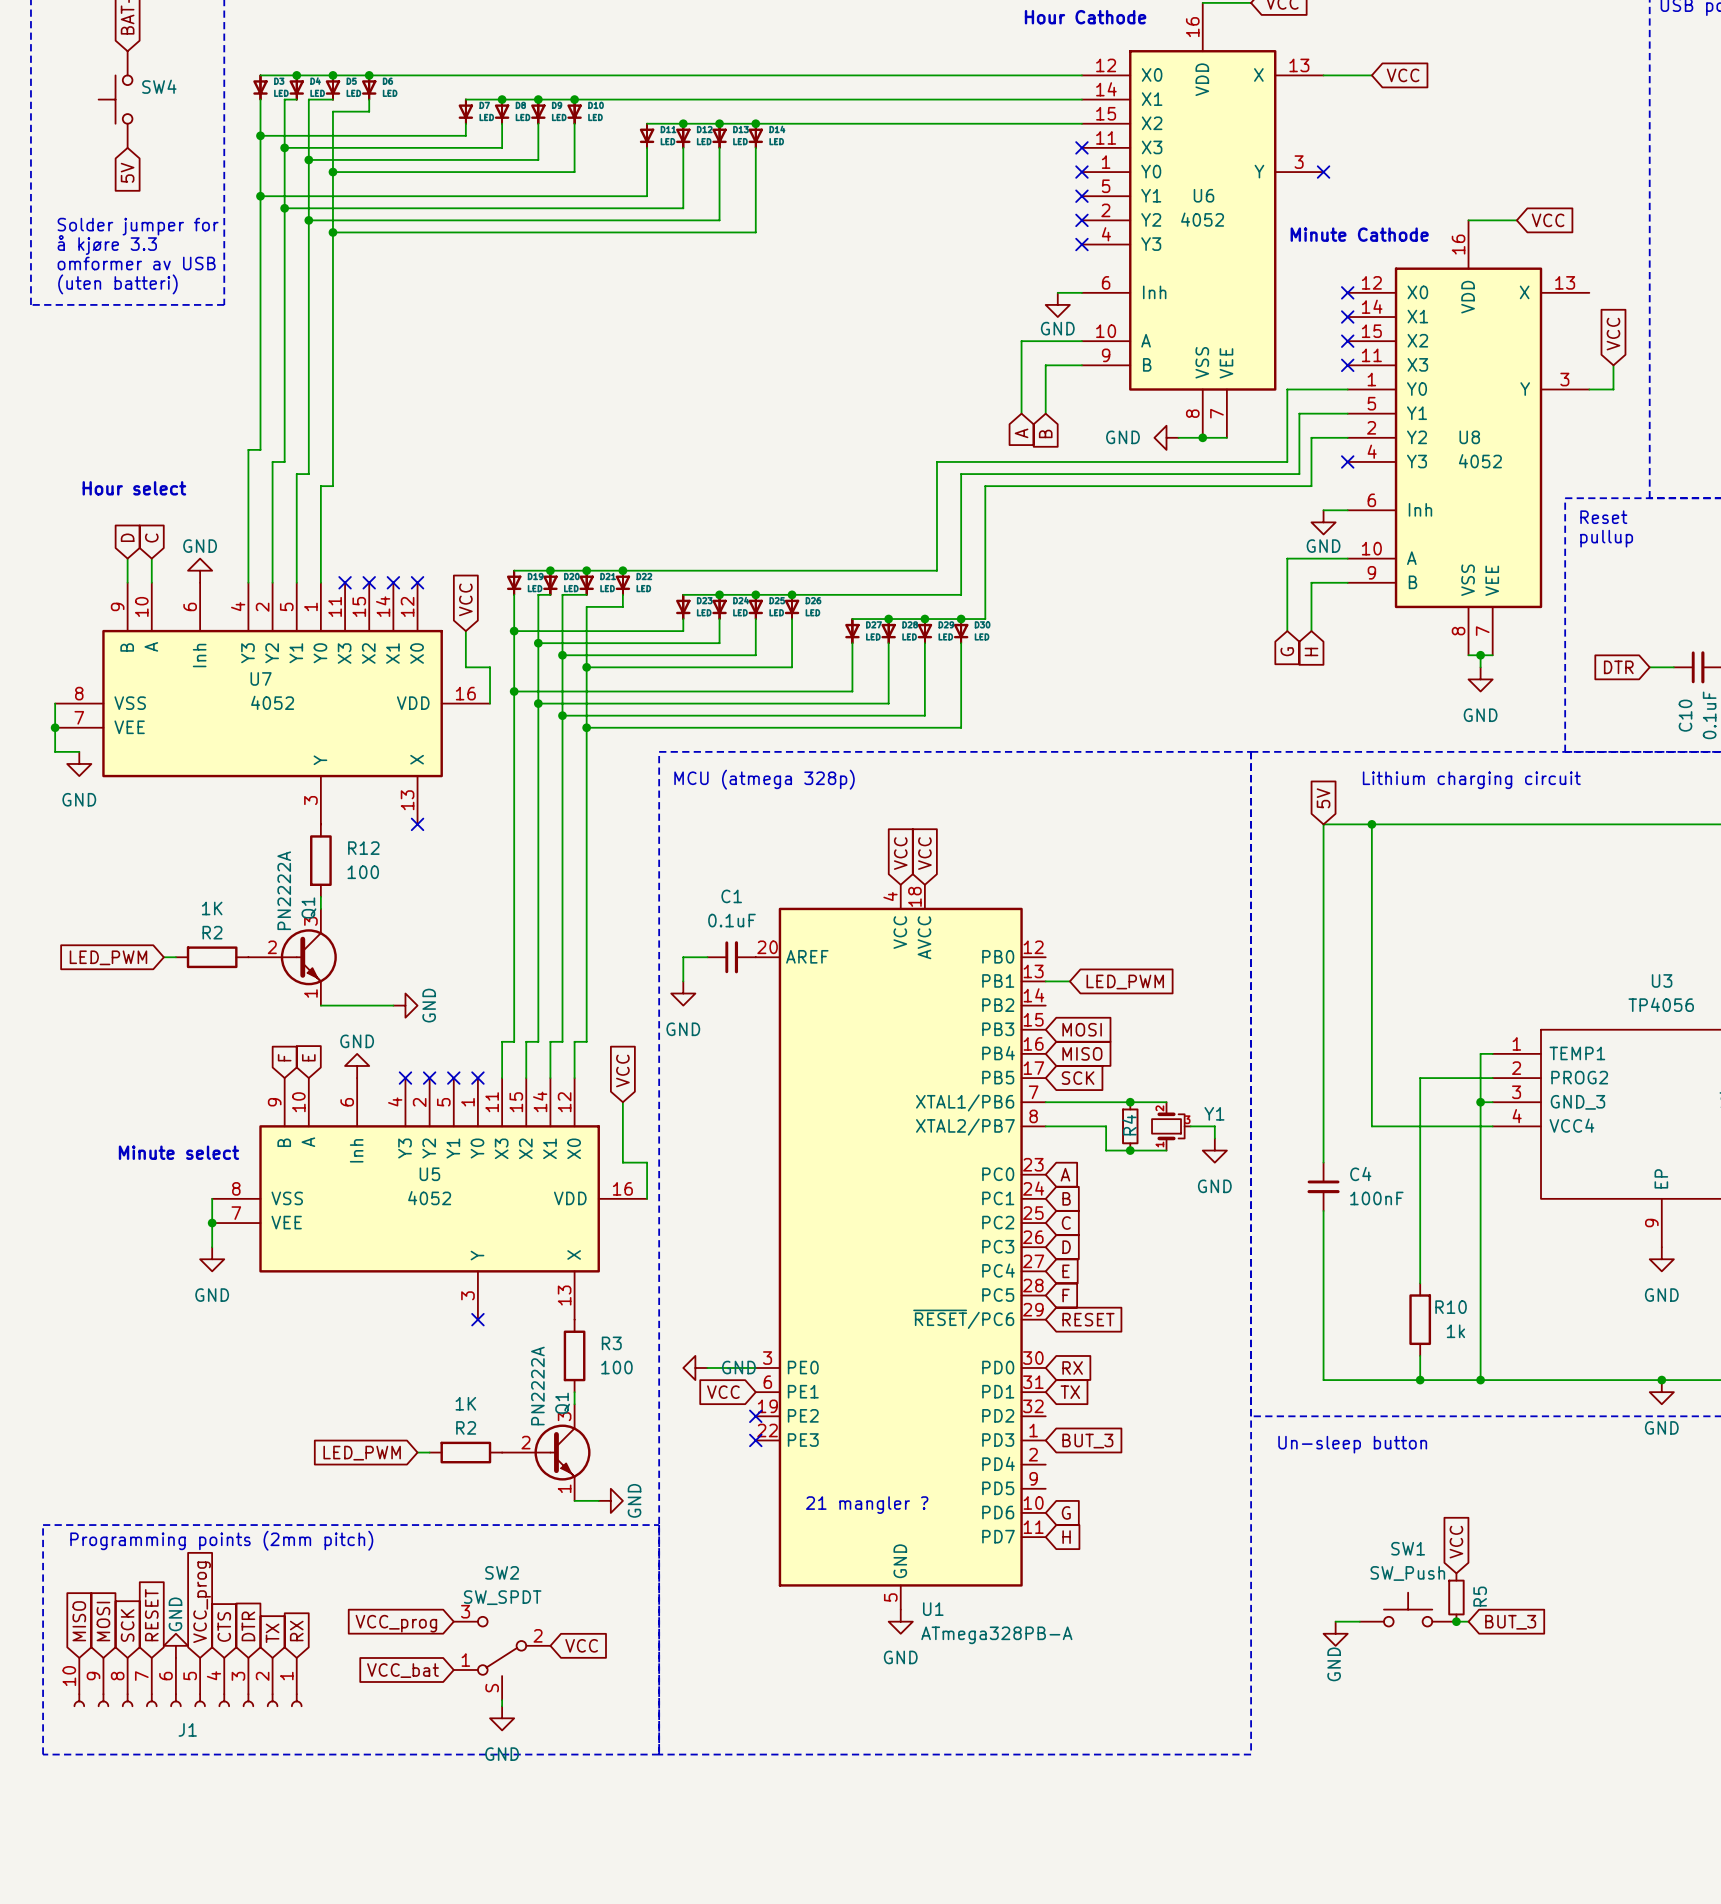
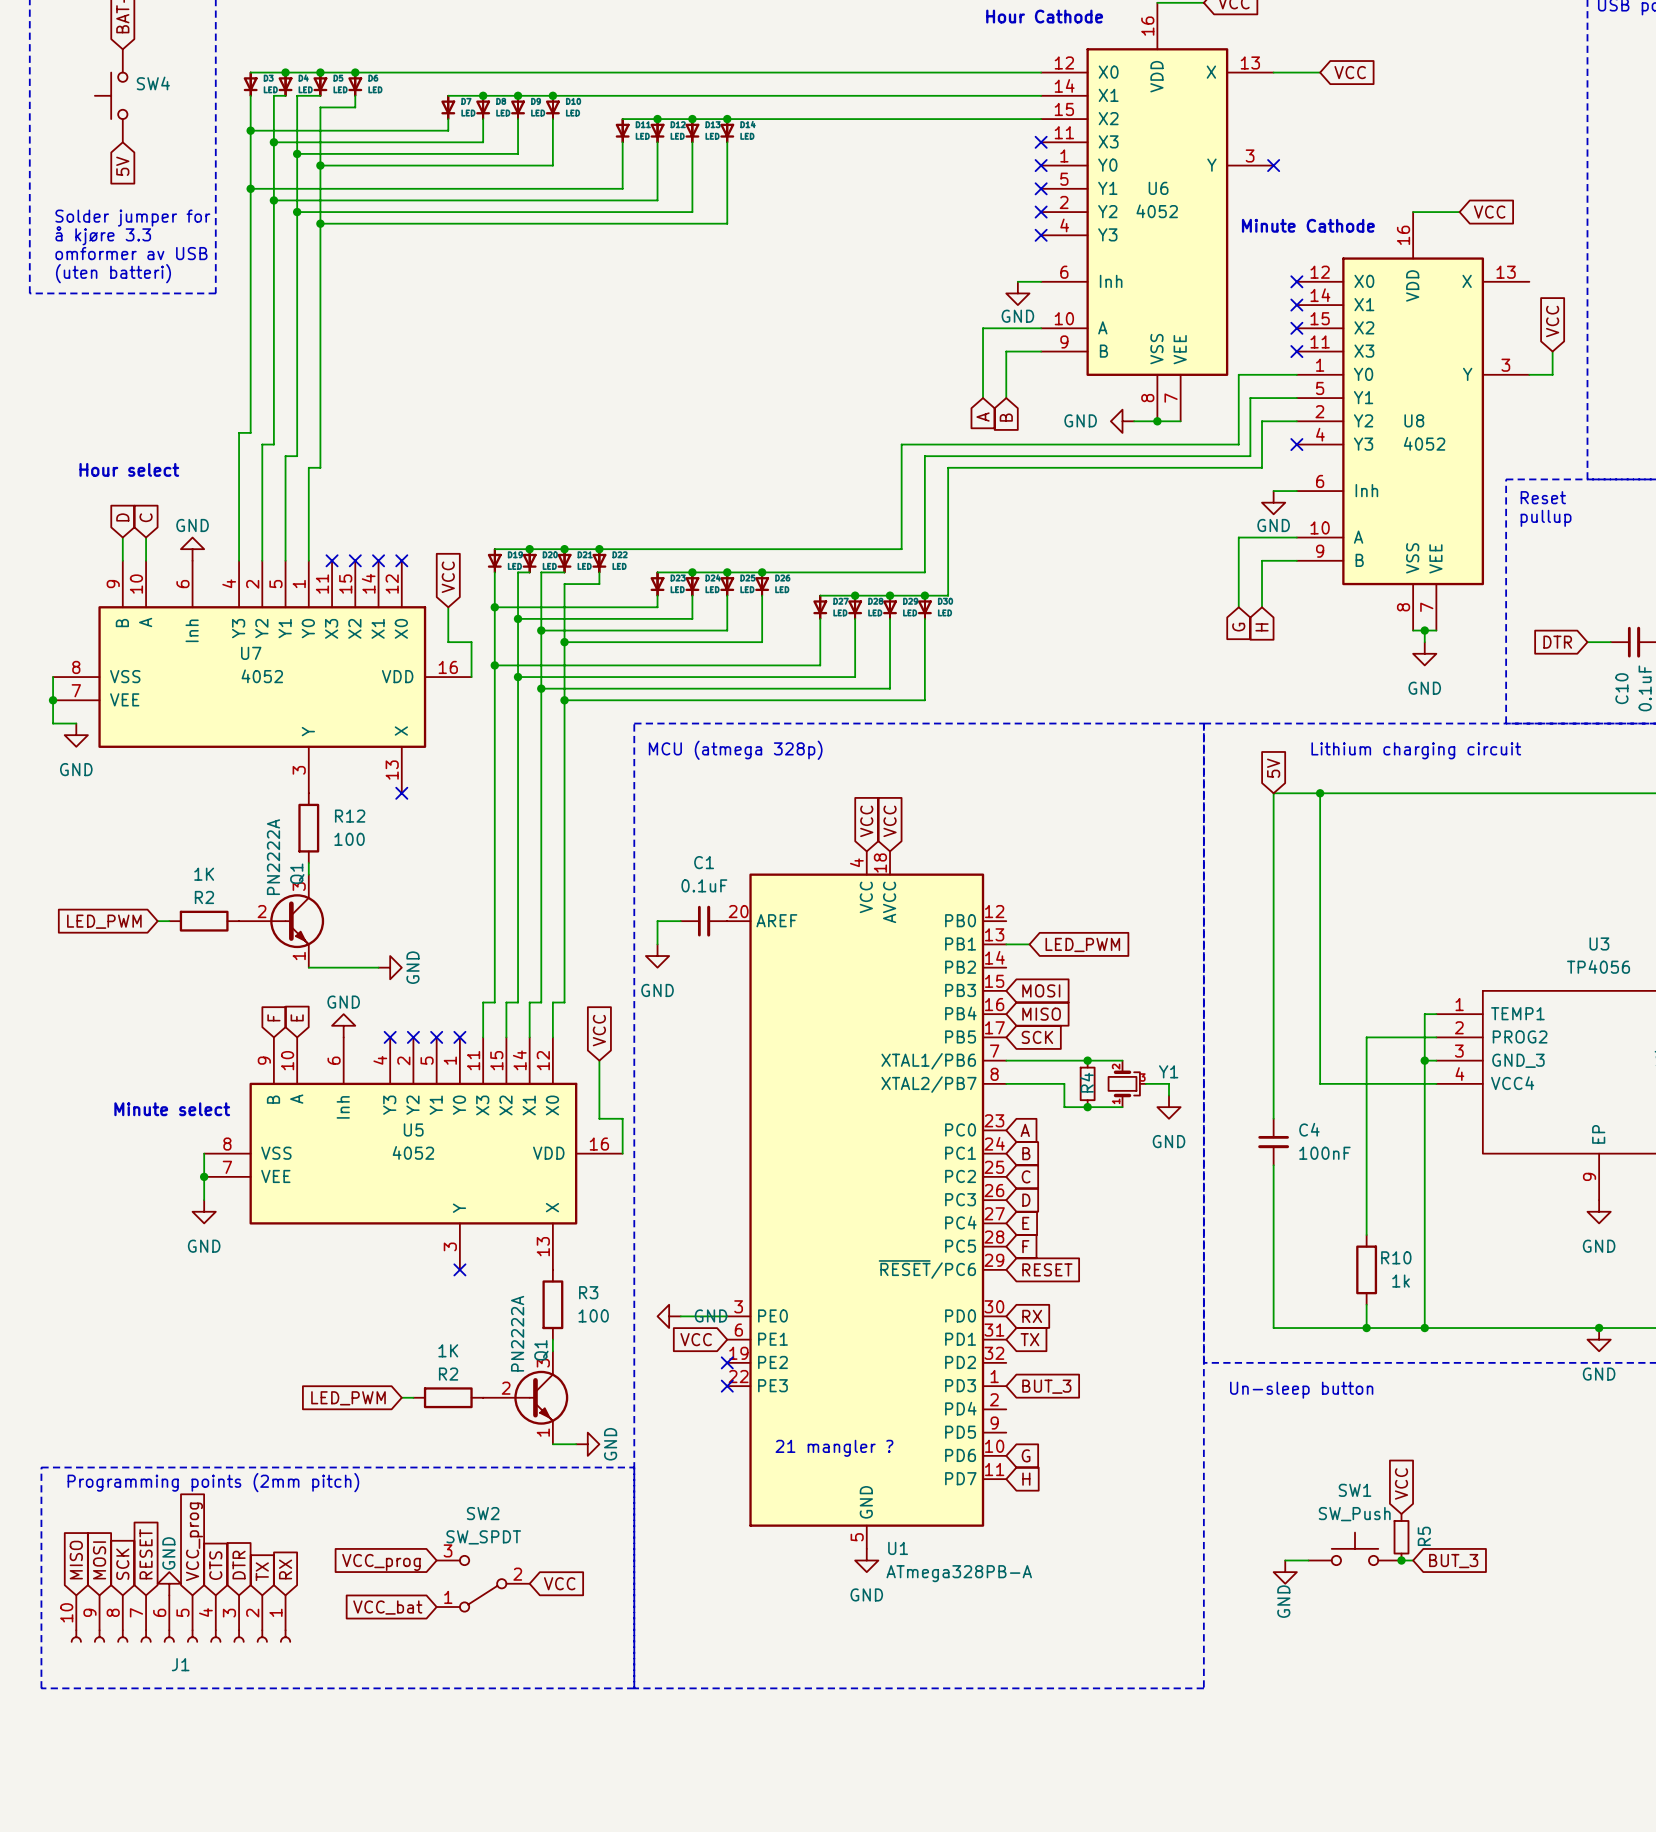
SW2 symbol: [453, 1616, 551, 1701] -> [436, 1555, 530, 1612]
wire: (502, 1700) (502, 1706) -> none
power symbol: GND (502, 1718) -> none

